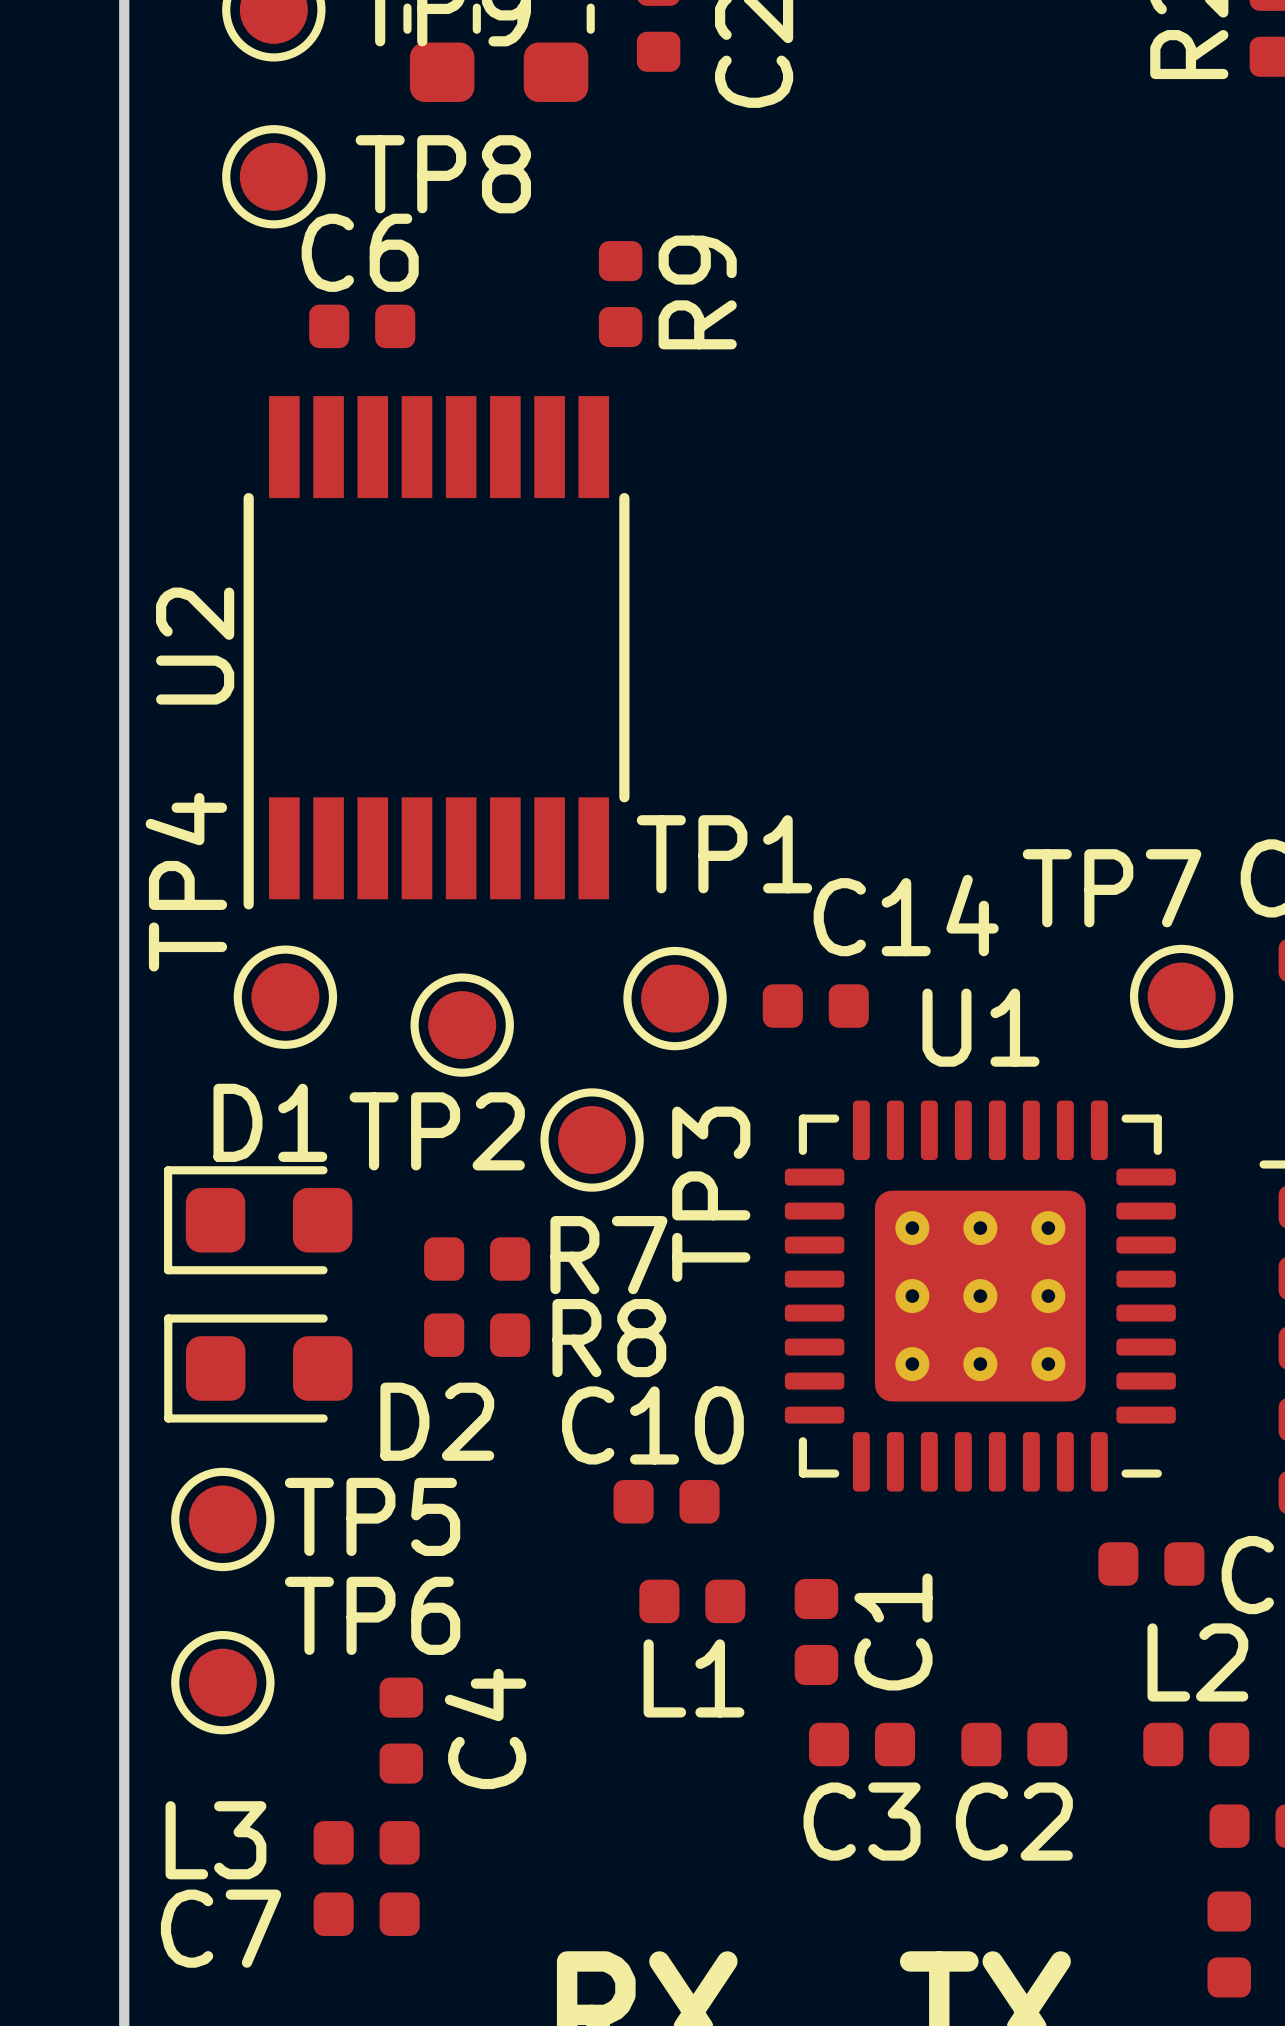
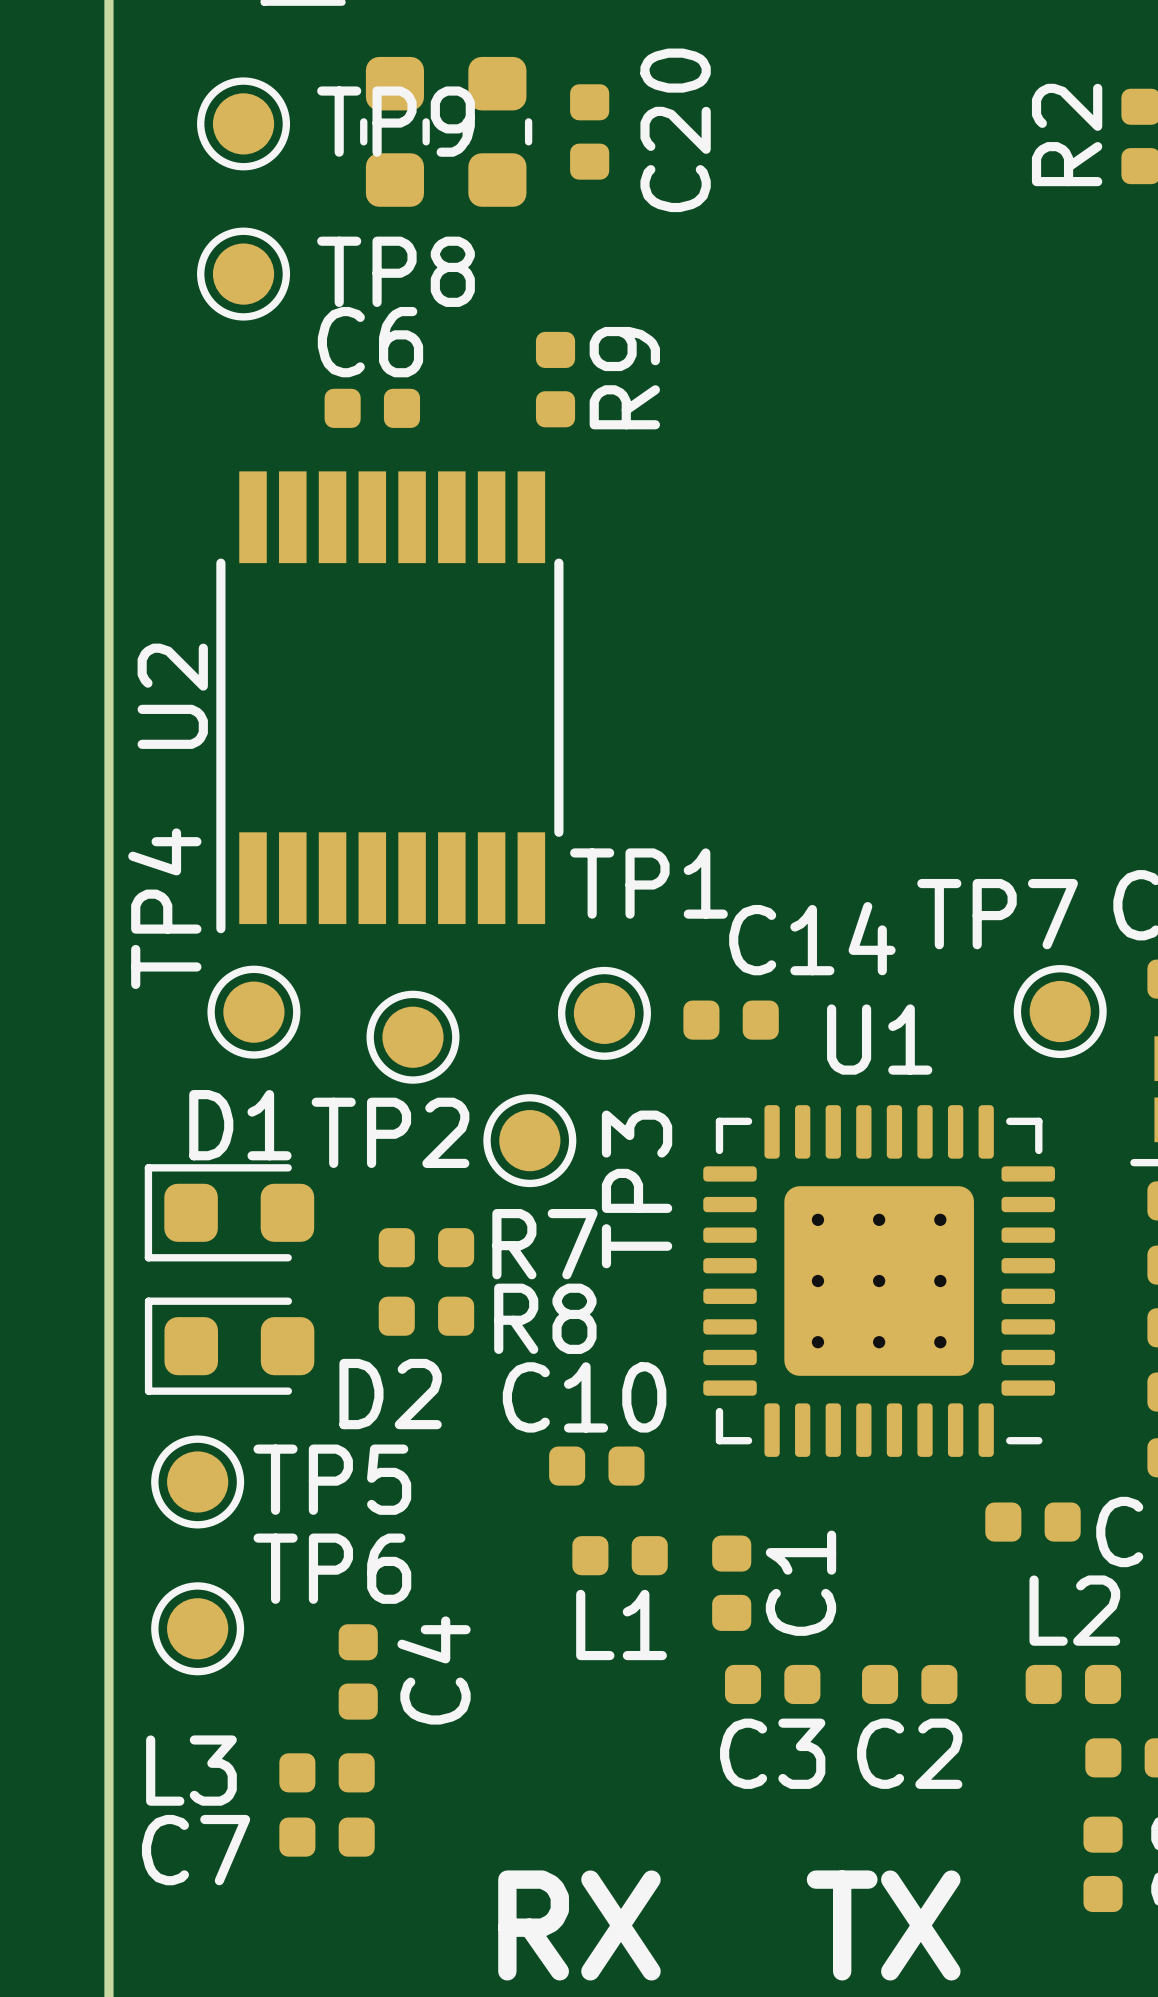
C6 position: (362, 326) -> (372, 408)

